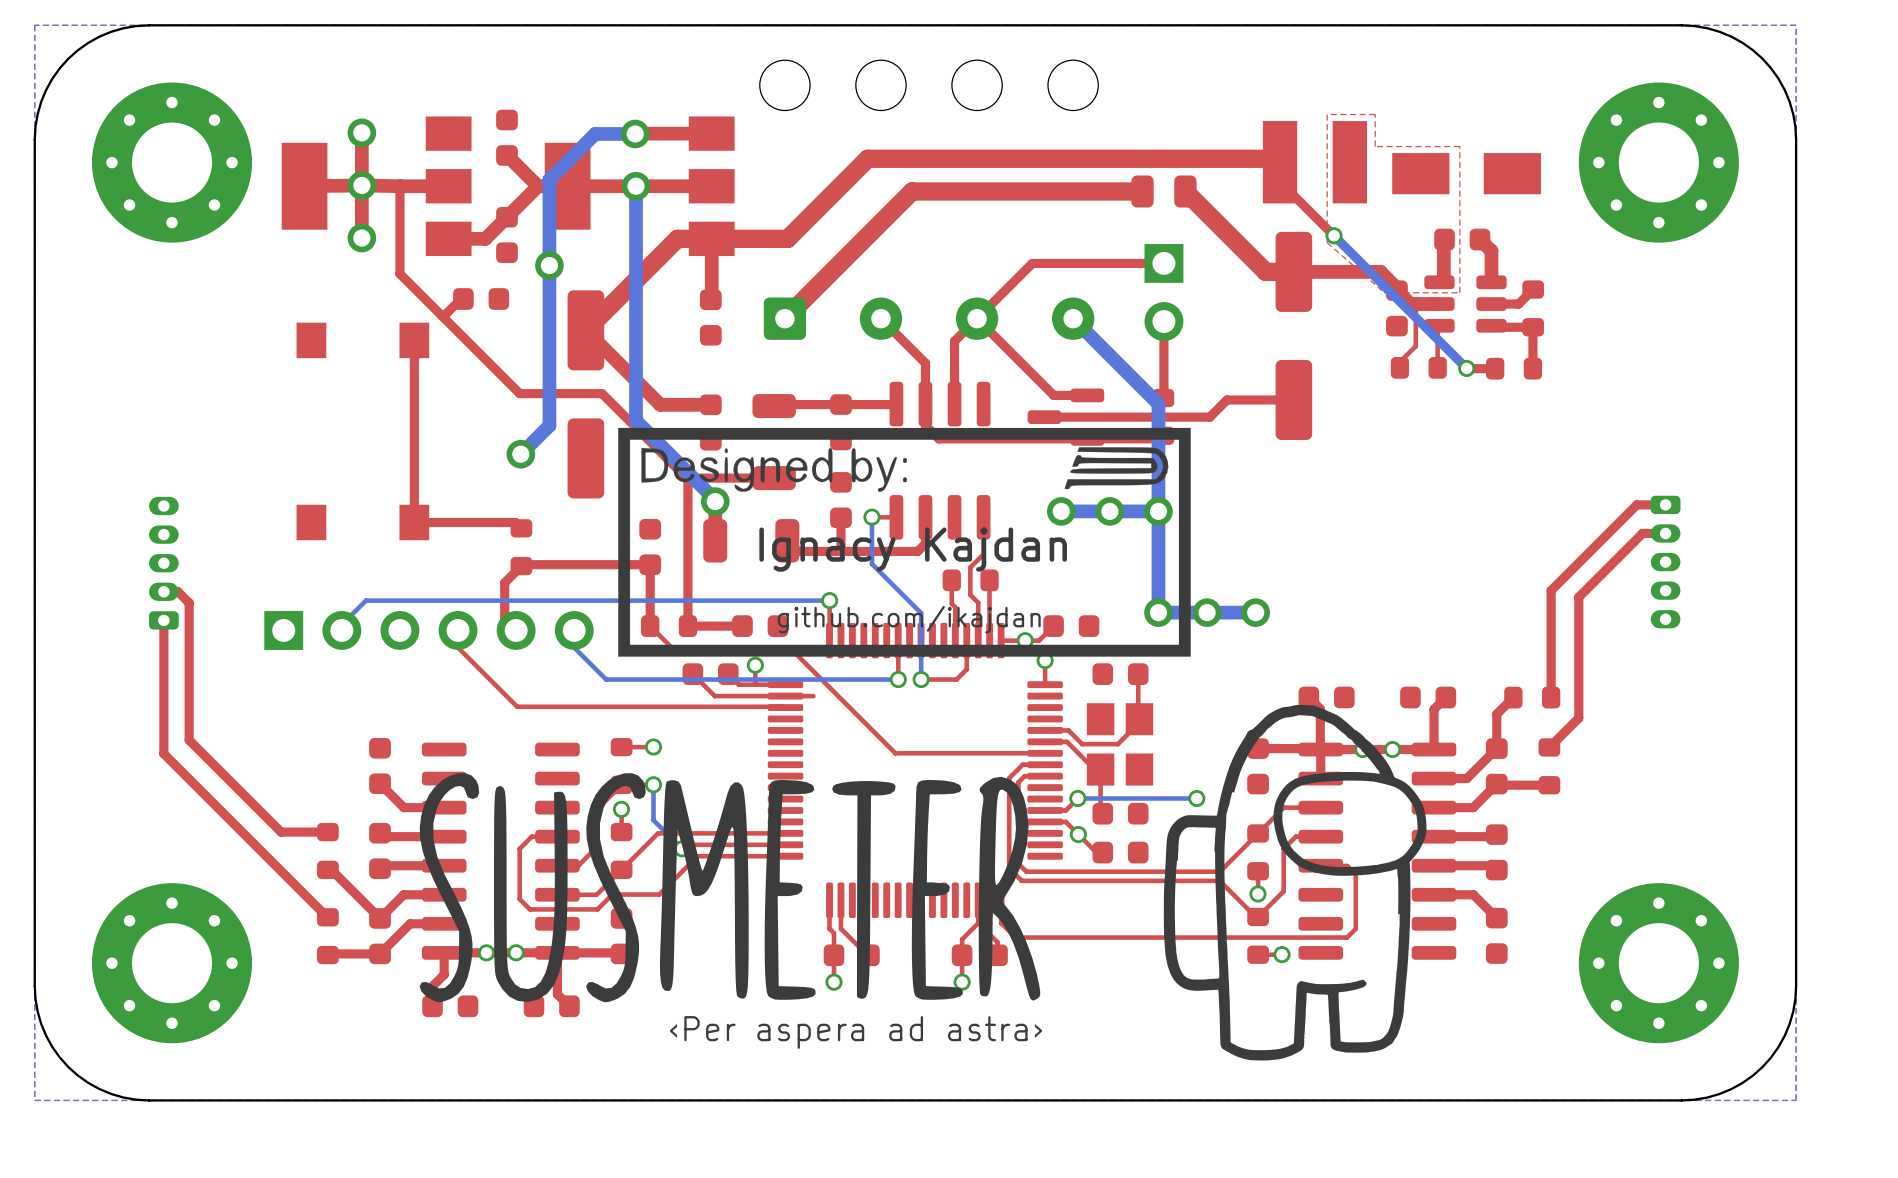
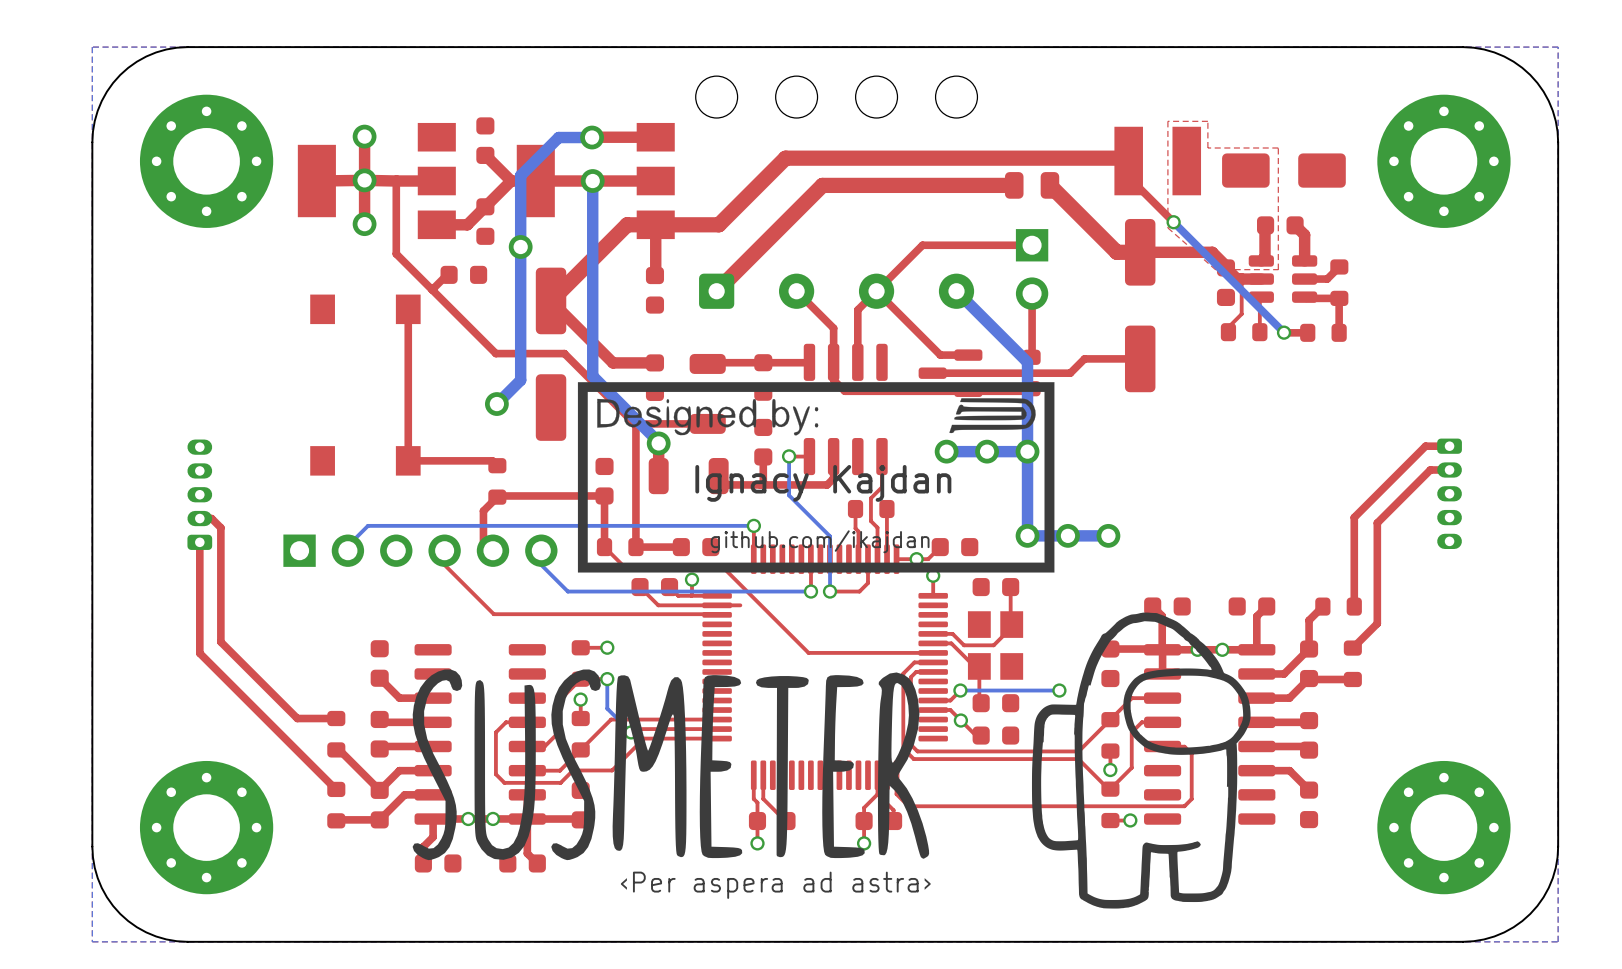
part footprint: [1392, 153, 1541, 195] -> [1222, 153, 1346, 188]

